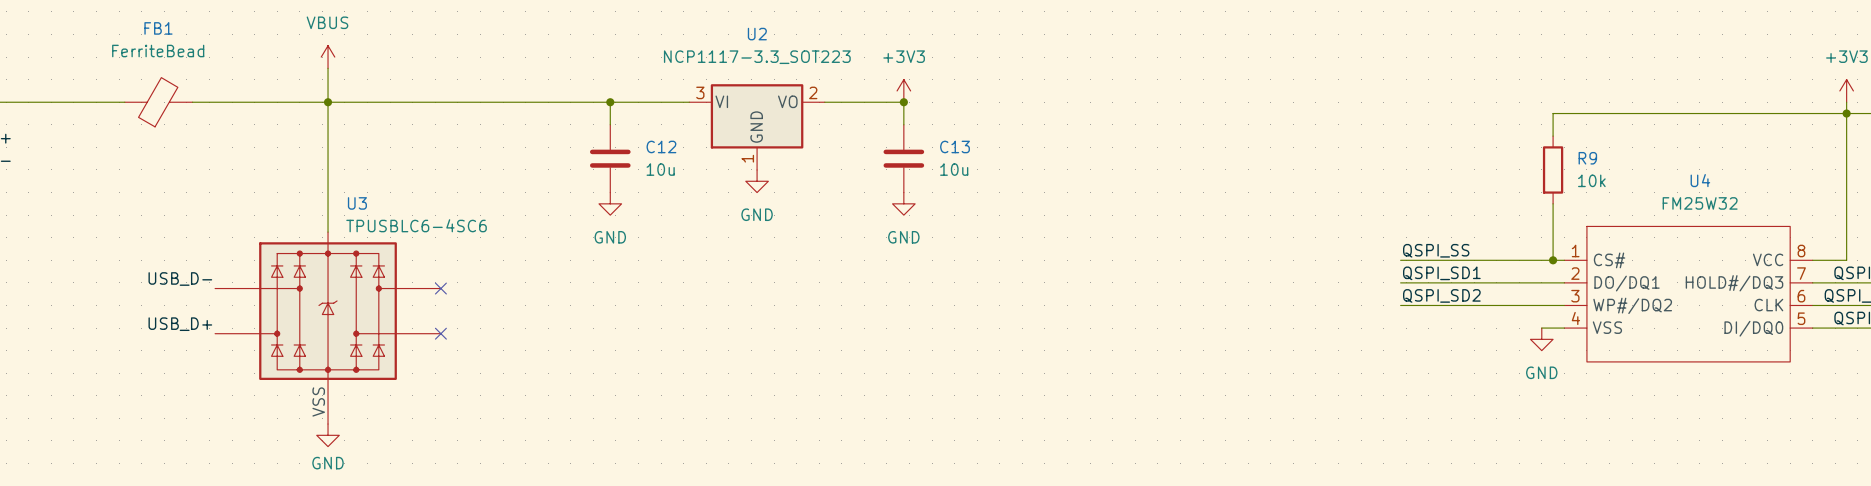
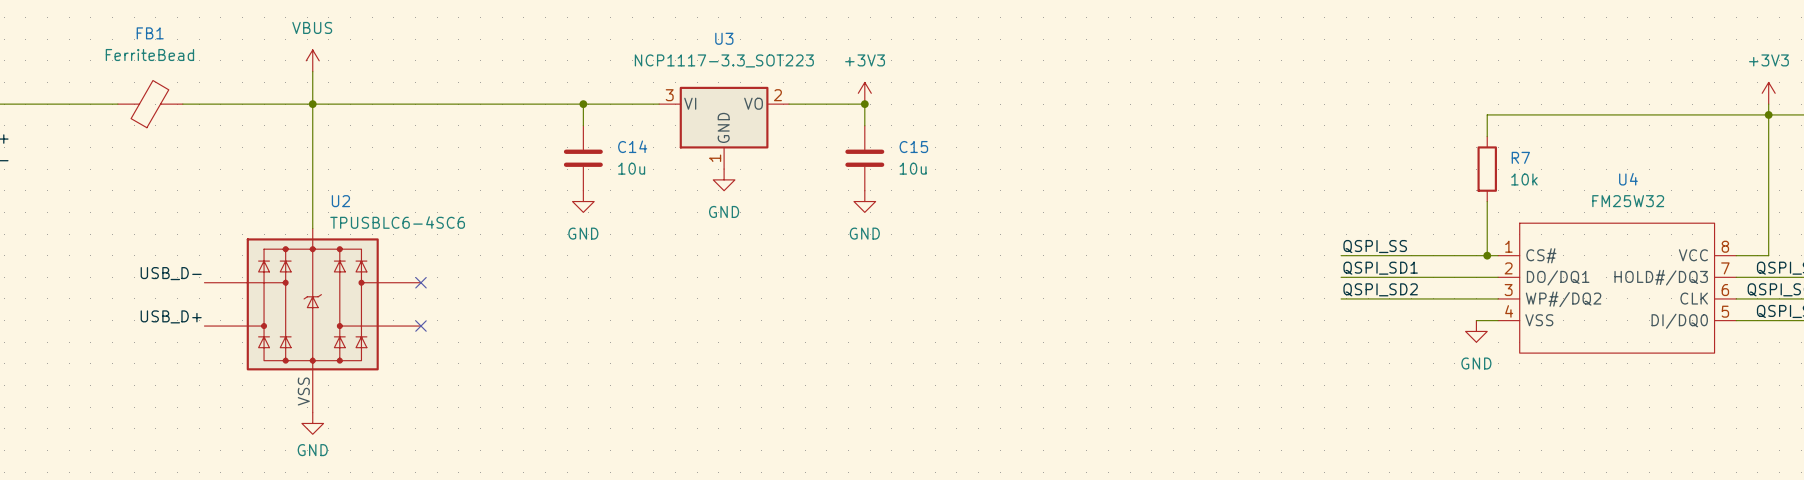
U2 name: U2 (757, 34) -> U3 (724, 38)
C12 name: C12 (661, 146) -> C14 (632, 146)
C13 name: C13 (955, 146) -> C15 (913, 147)
R9 name: R9 (1587, 158) -> R7 (1520, 157)
U3 name: U3 (357, 203) -> U2 (340, 201)

